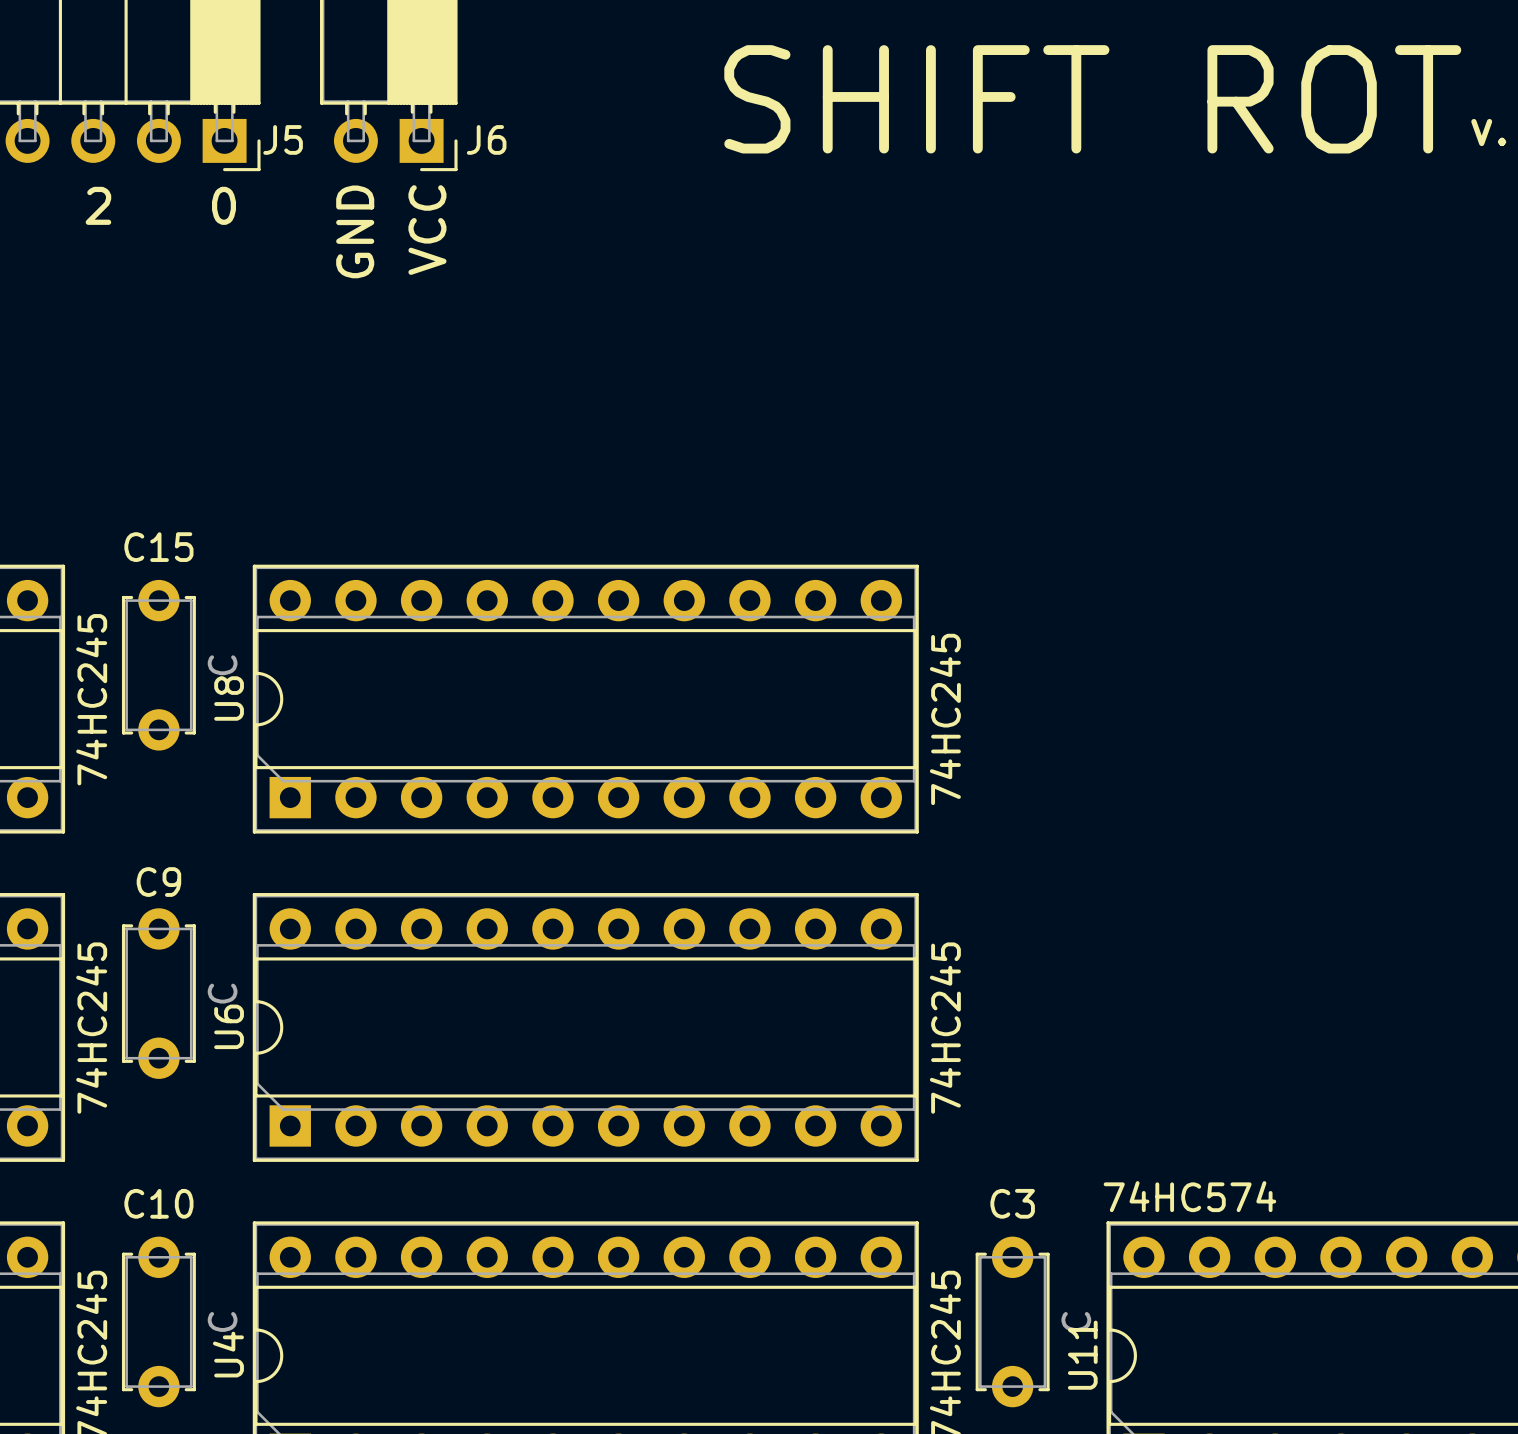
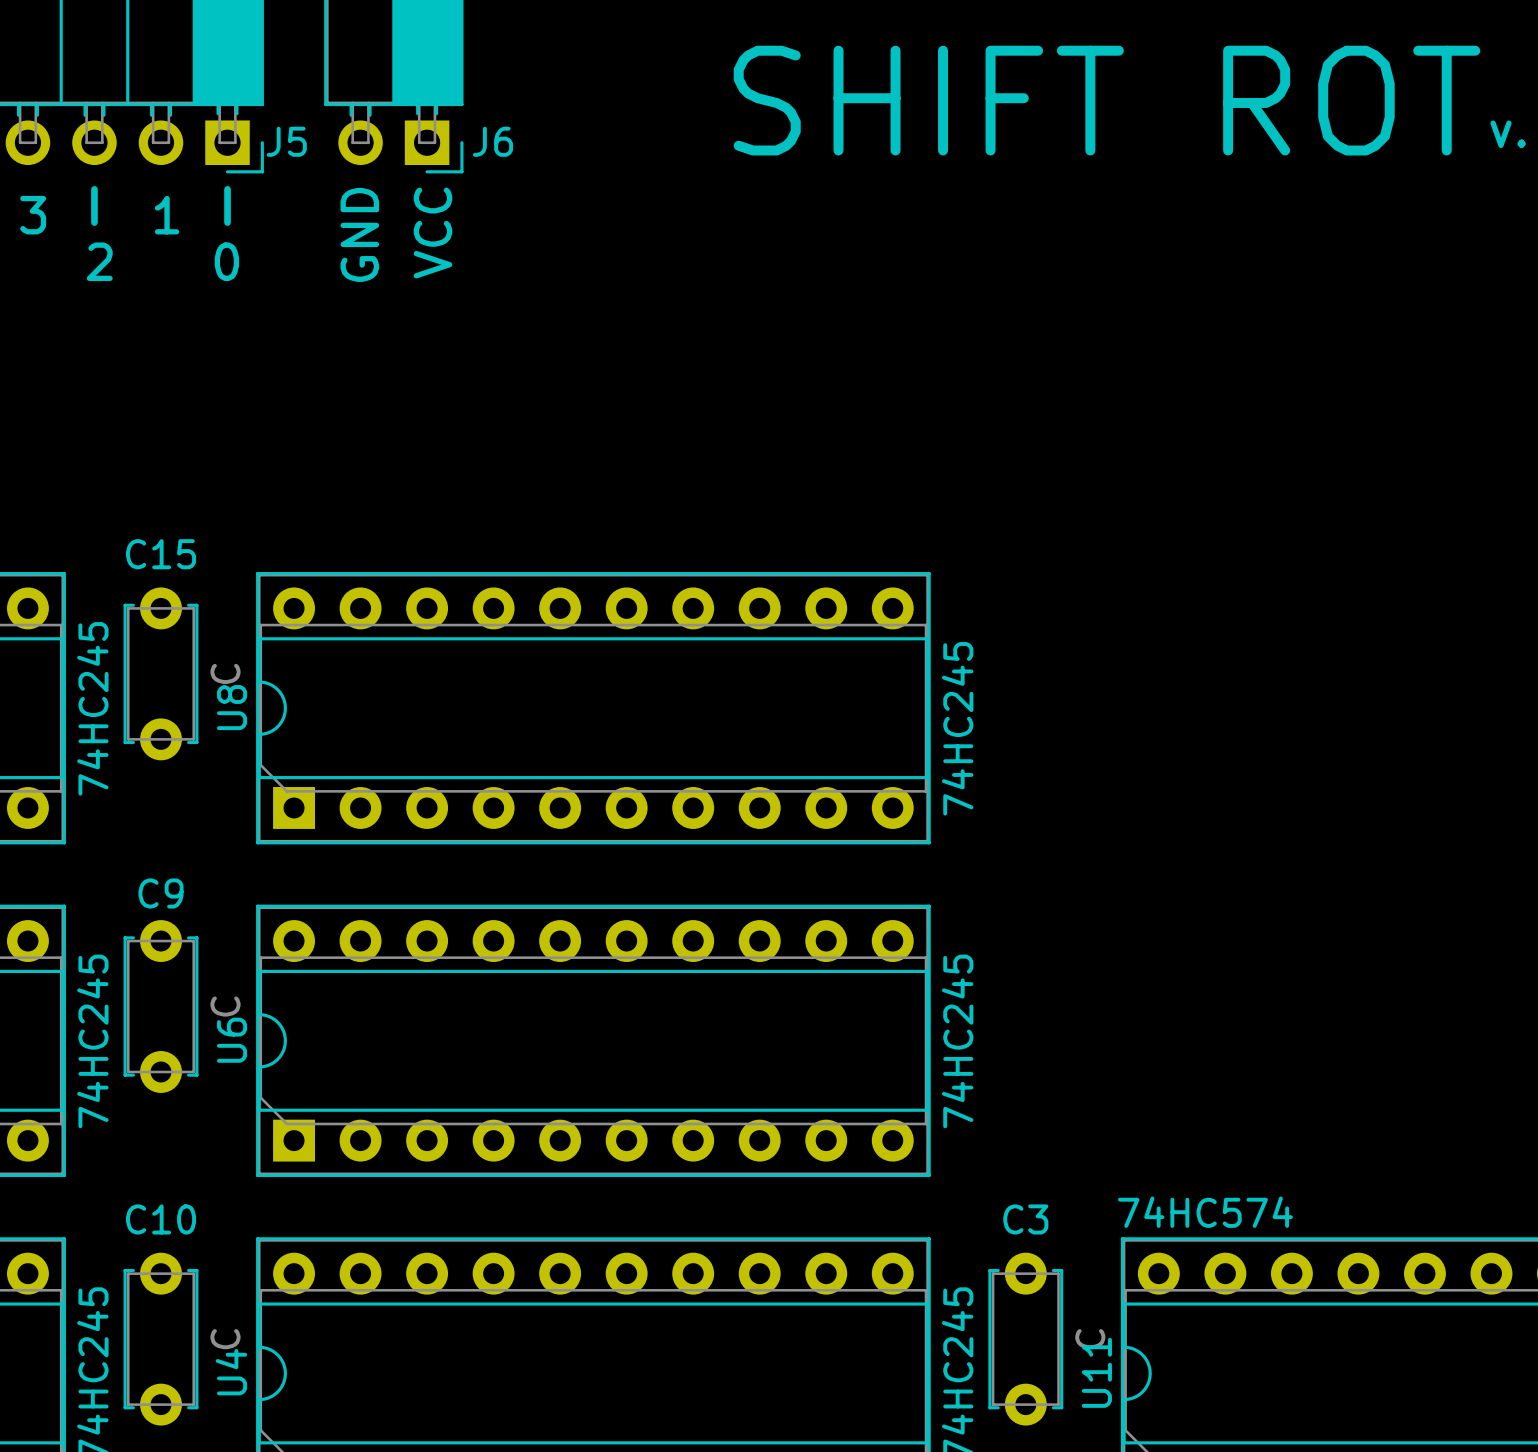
line: none -> (94, 189) (94, 222)
line: none -> (227, 189) (227, 222)
text position: 2 (98, 205) -> 2 (99, 261)
text position: 0 (223, 205) -> 0 (226, 261)
text: none -> 3 (33, 215)
text: none -> 1 (167, 215)

